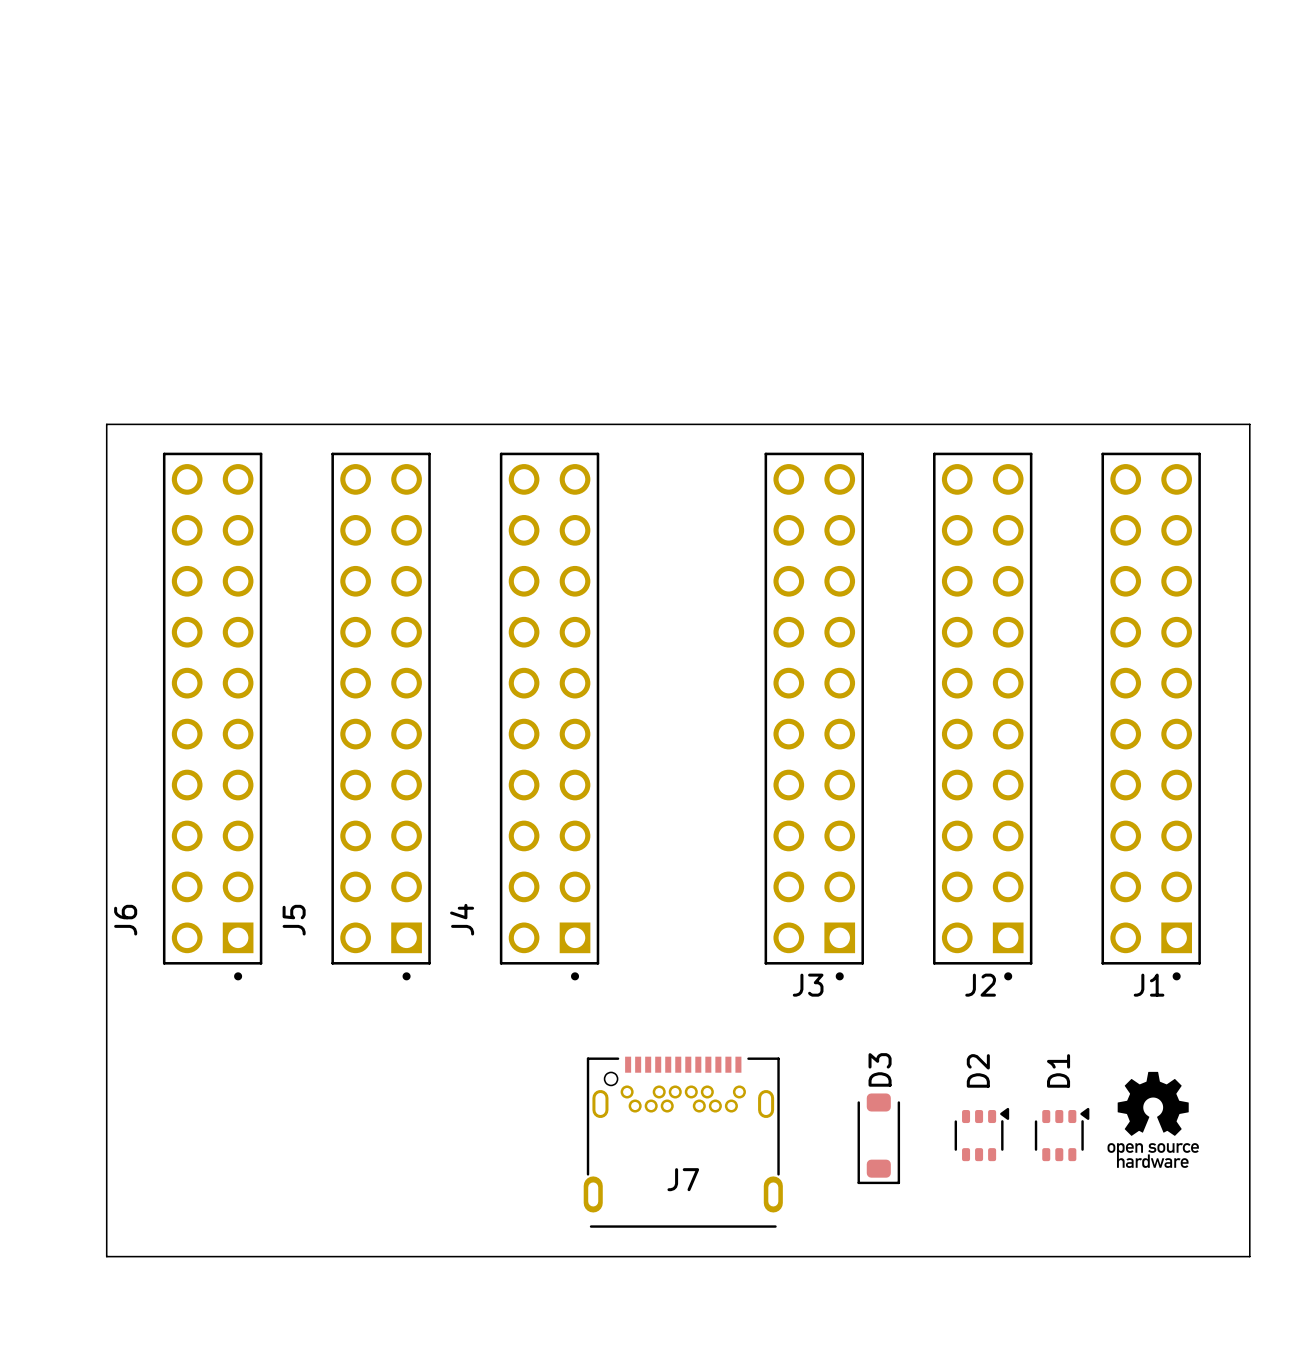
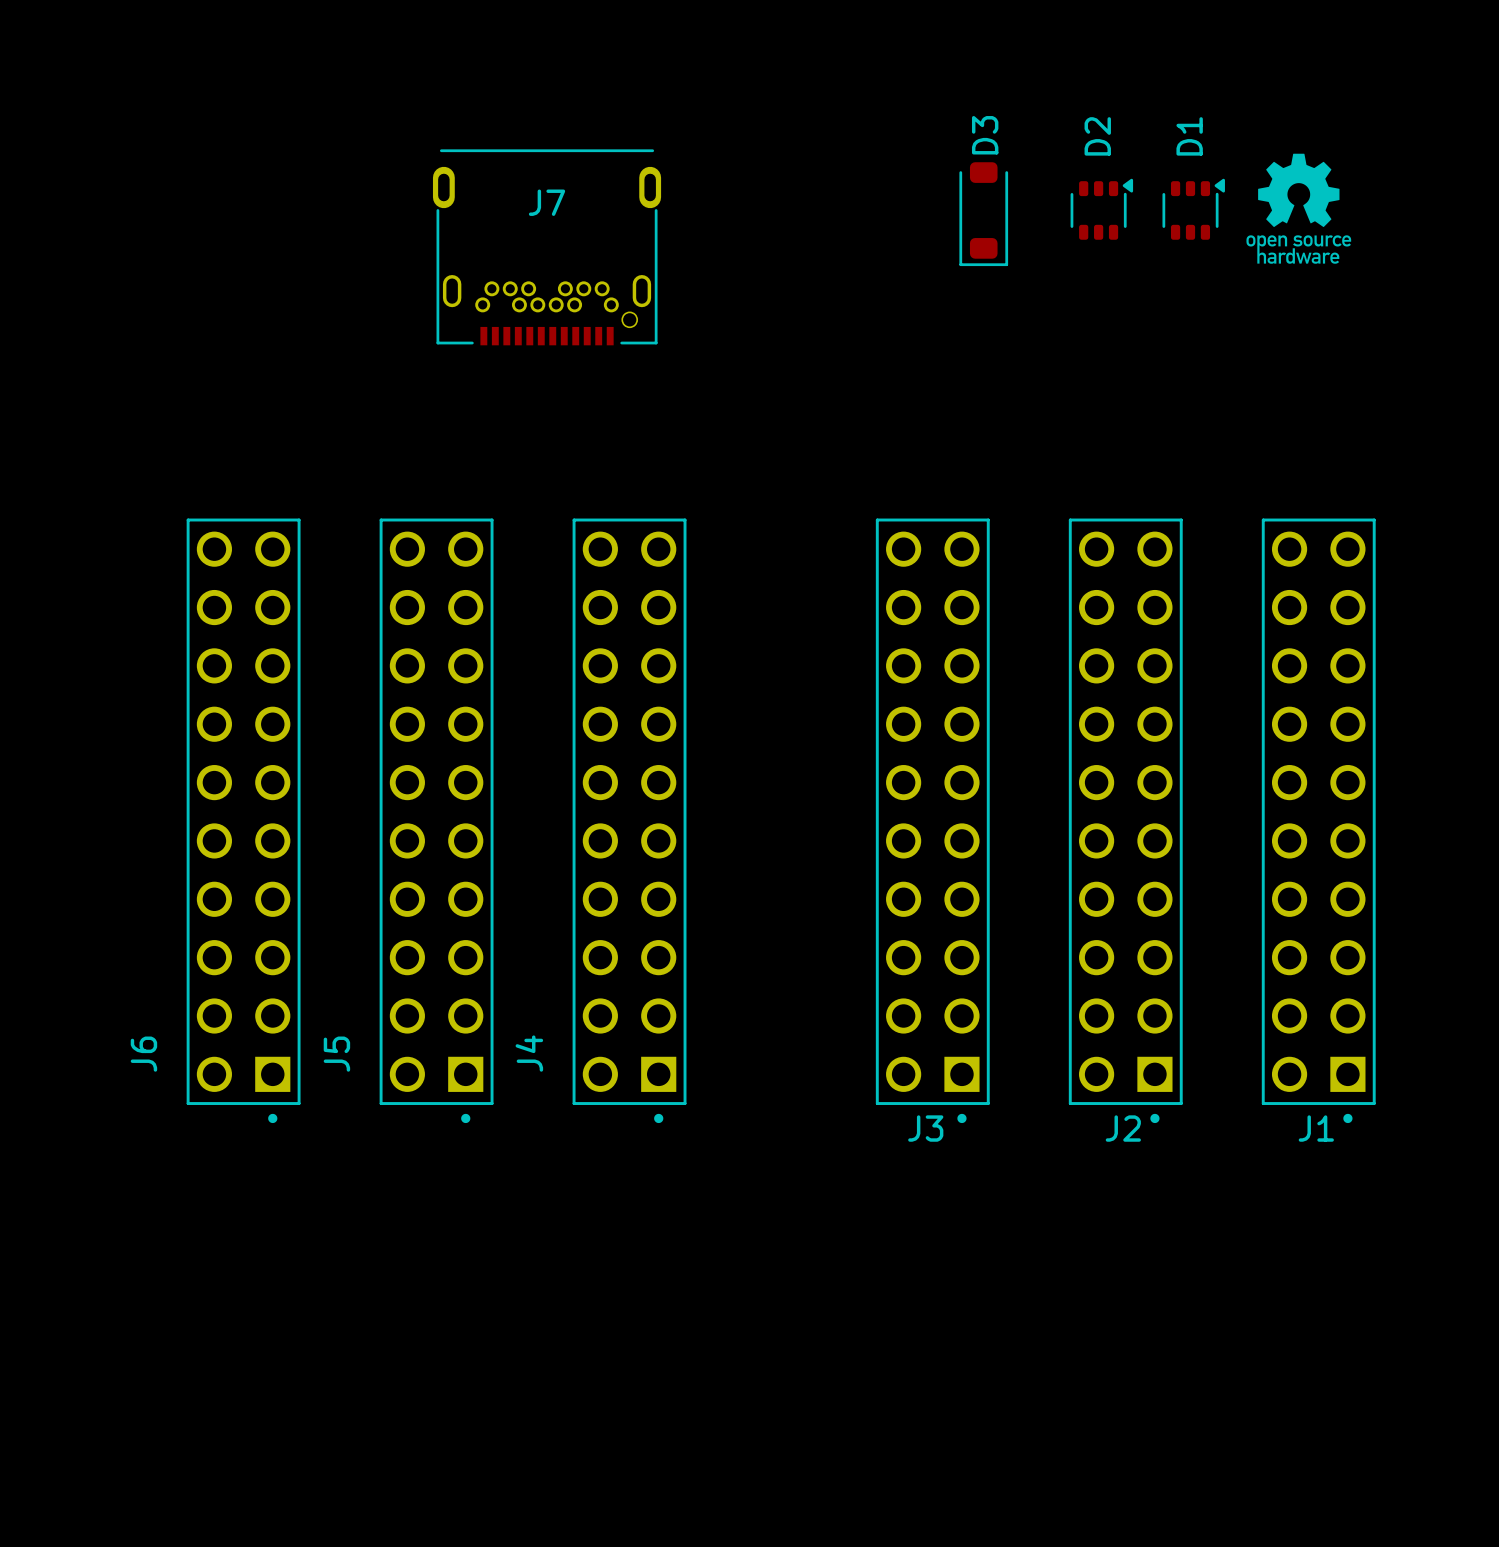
drawing: none -> [1246, 153, 1352, 264]
board edge: (106, 424) (1249, 424) (1249, 1256) (106, 1256) (106, 424) -> none
drawing: [1107, 1071, 1199, 1168] -> none
D2 position: (981, 1134) -> (1101, 209)
D1 position: (1062, 1134) -> (1193, 209)
D3 position: (878, 1138) -> (983, 214)
J7 rotation: 0° (683, 1142) -> 180° (547, 247)
J7 position: (683, 1142) -> (547, 247)

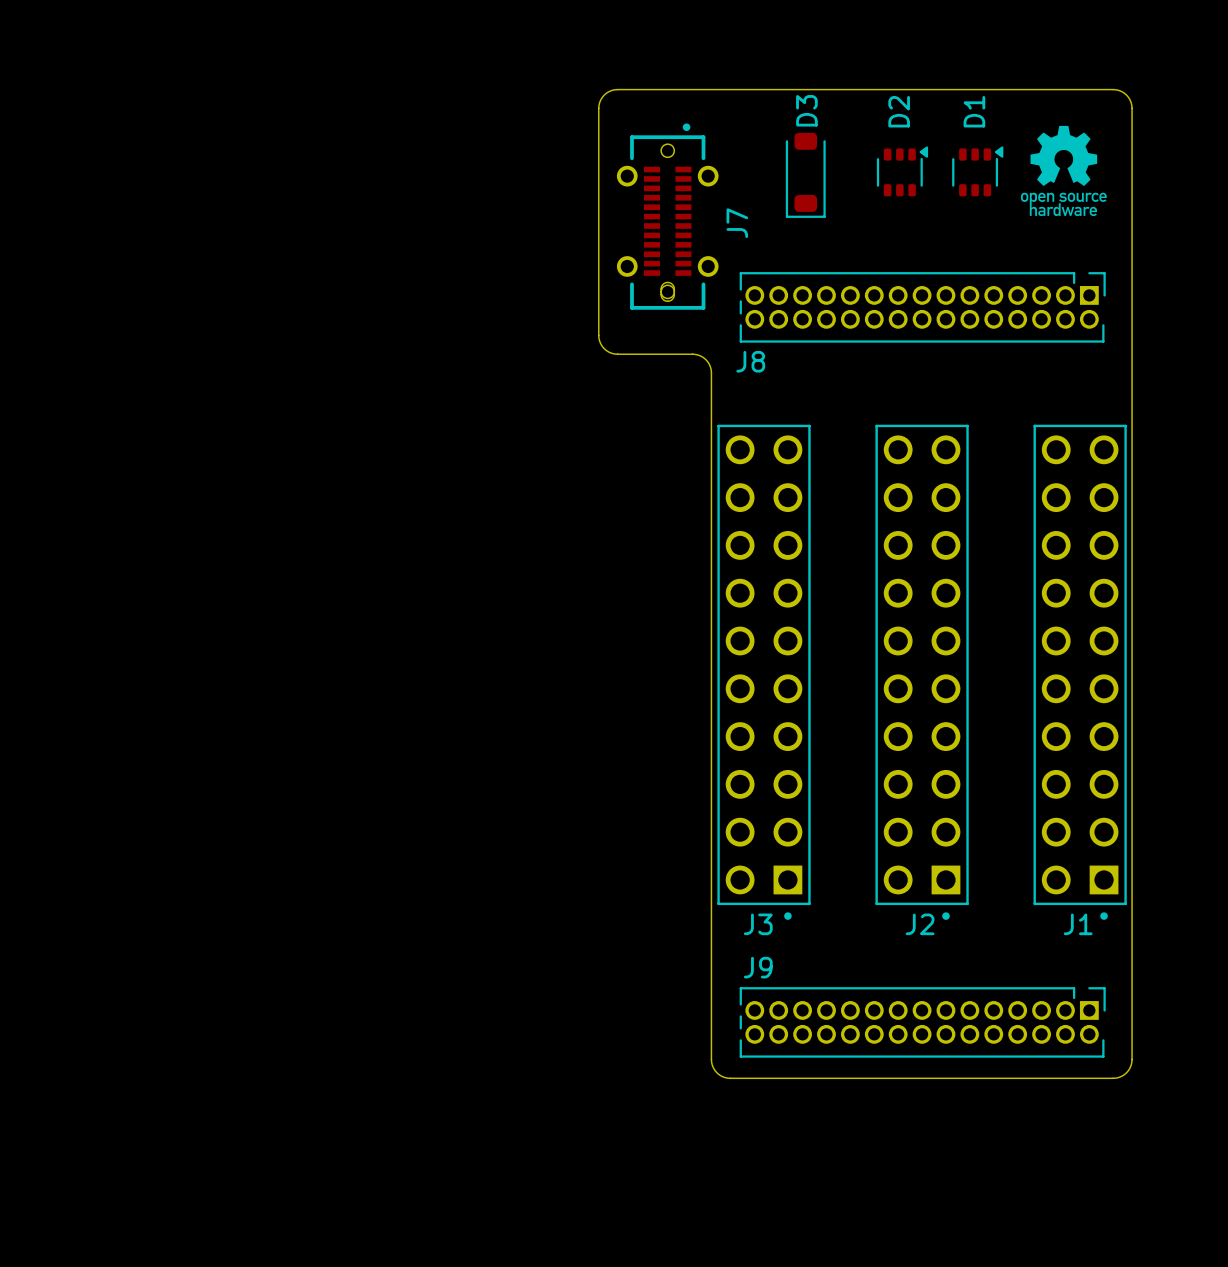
board edge: none -> (617, 89) (1113, 89) (1123, 92) (1130, 100) (1132, 108) (1132, 1059) (1129, 1069) (1121, 1076) (1113, 1078) (730, 1078) (720, 1075) (713, 1067) (711, 1059) (711, 370) (707, 361) (696, 354) (615, 354) (605, 350) (599, 341) (598, 106) (604, 95) (617, 89)
J7 footprint: [432, 149, 662, 346] -> [616, 123, 719, 310]
J7 name position: J7 (547, 202) -> J7 (737, 223)
J8: none -> (922, 307)
J6: (243, 820) -> none
J5: (436, 820) -> none
J4: (629, 820) -> none
J9: none -> (922, 1022)

